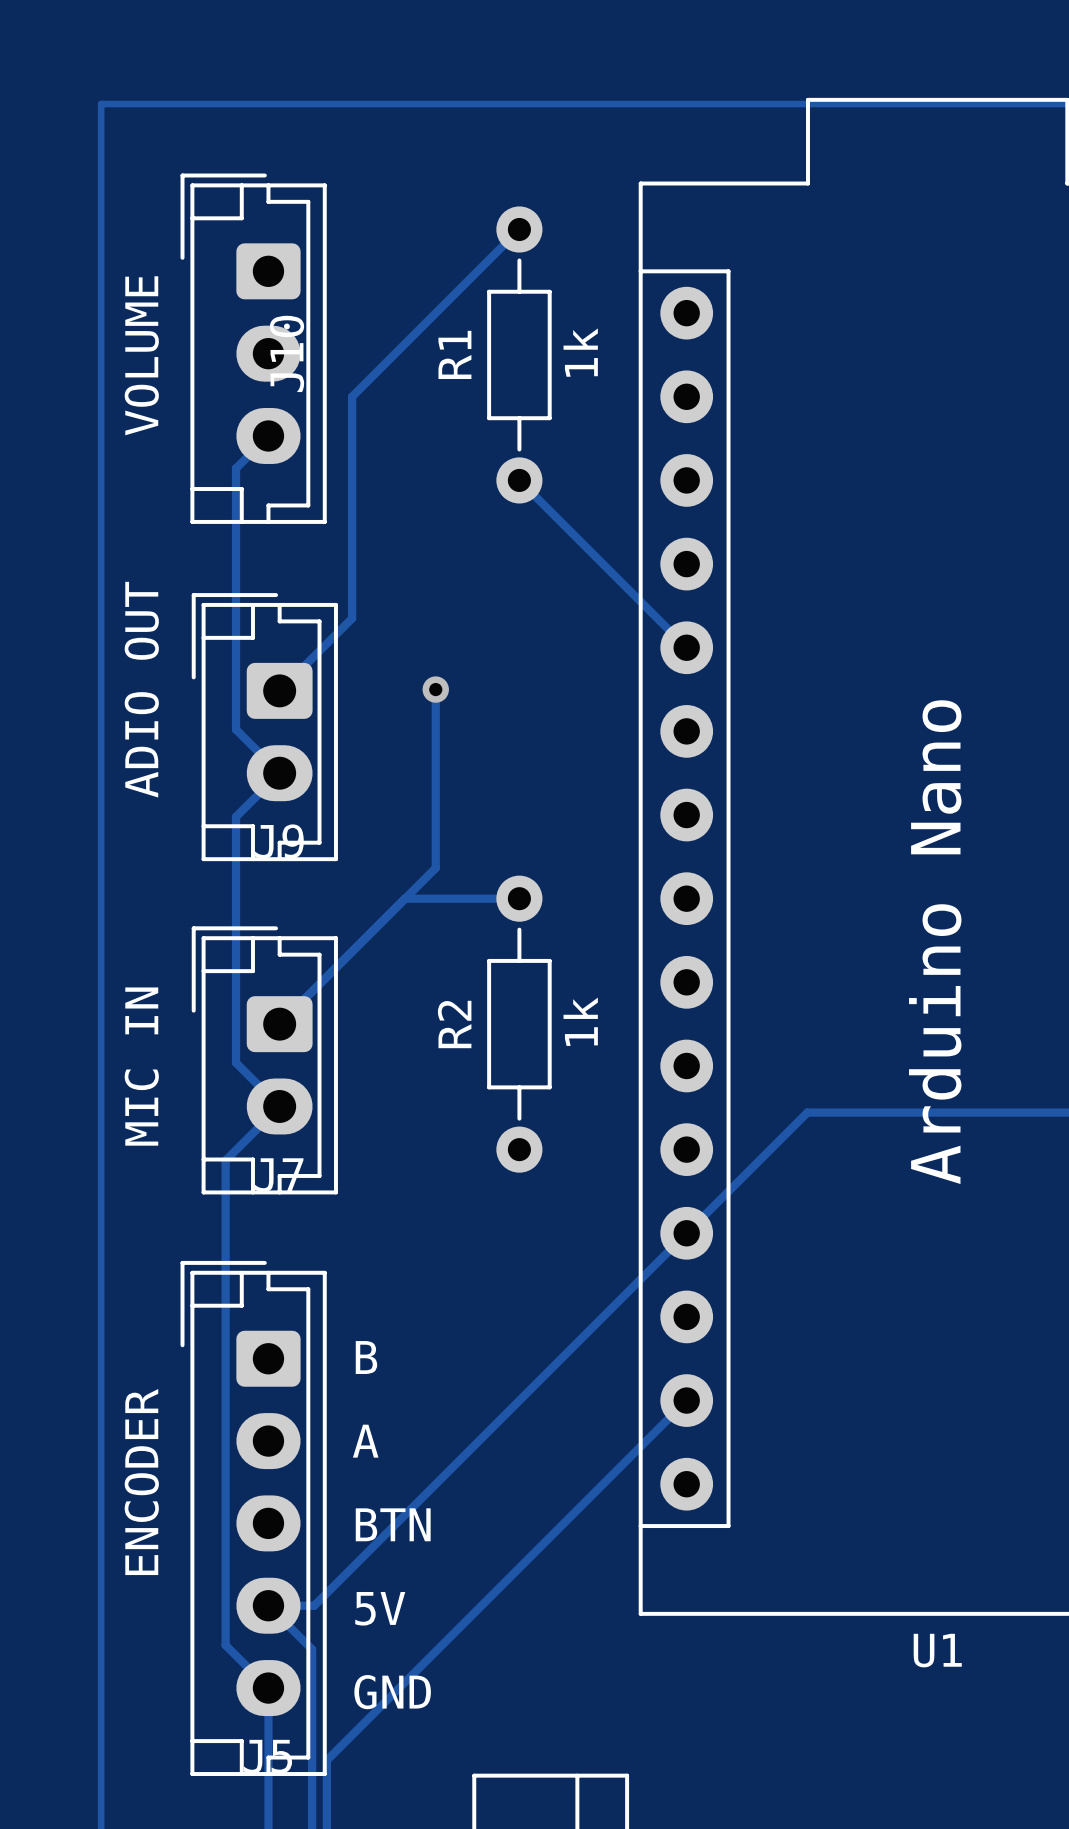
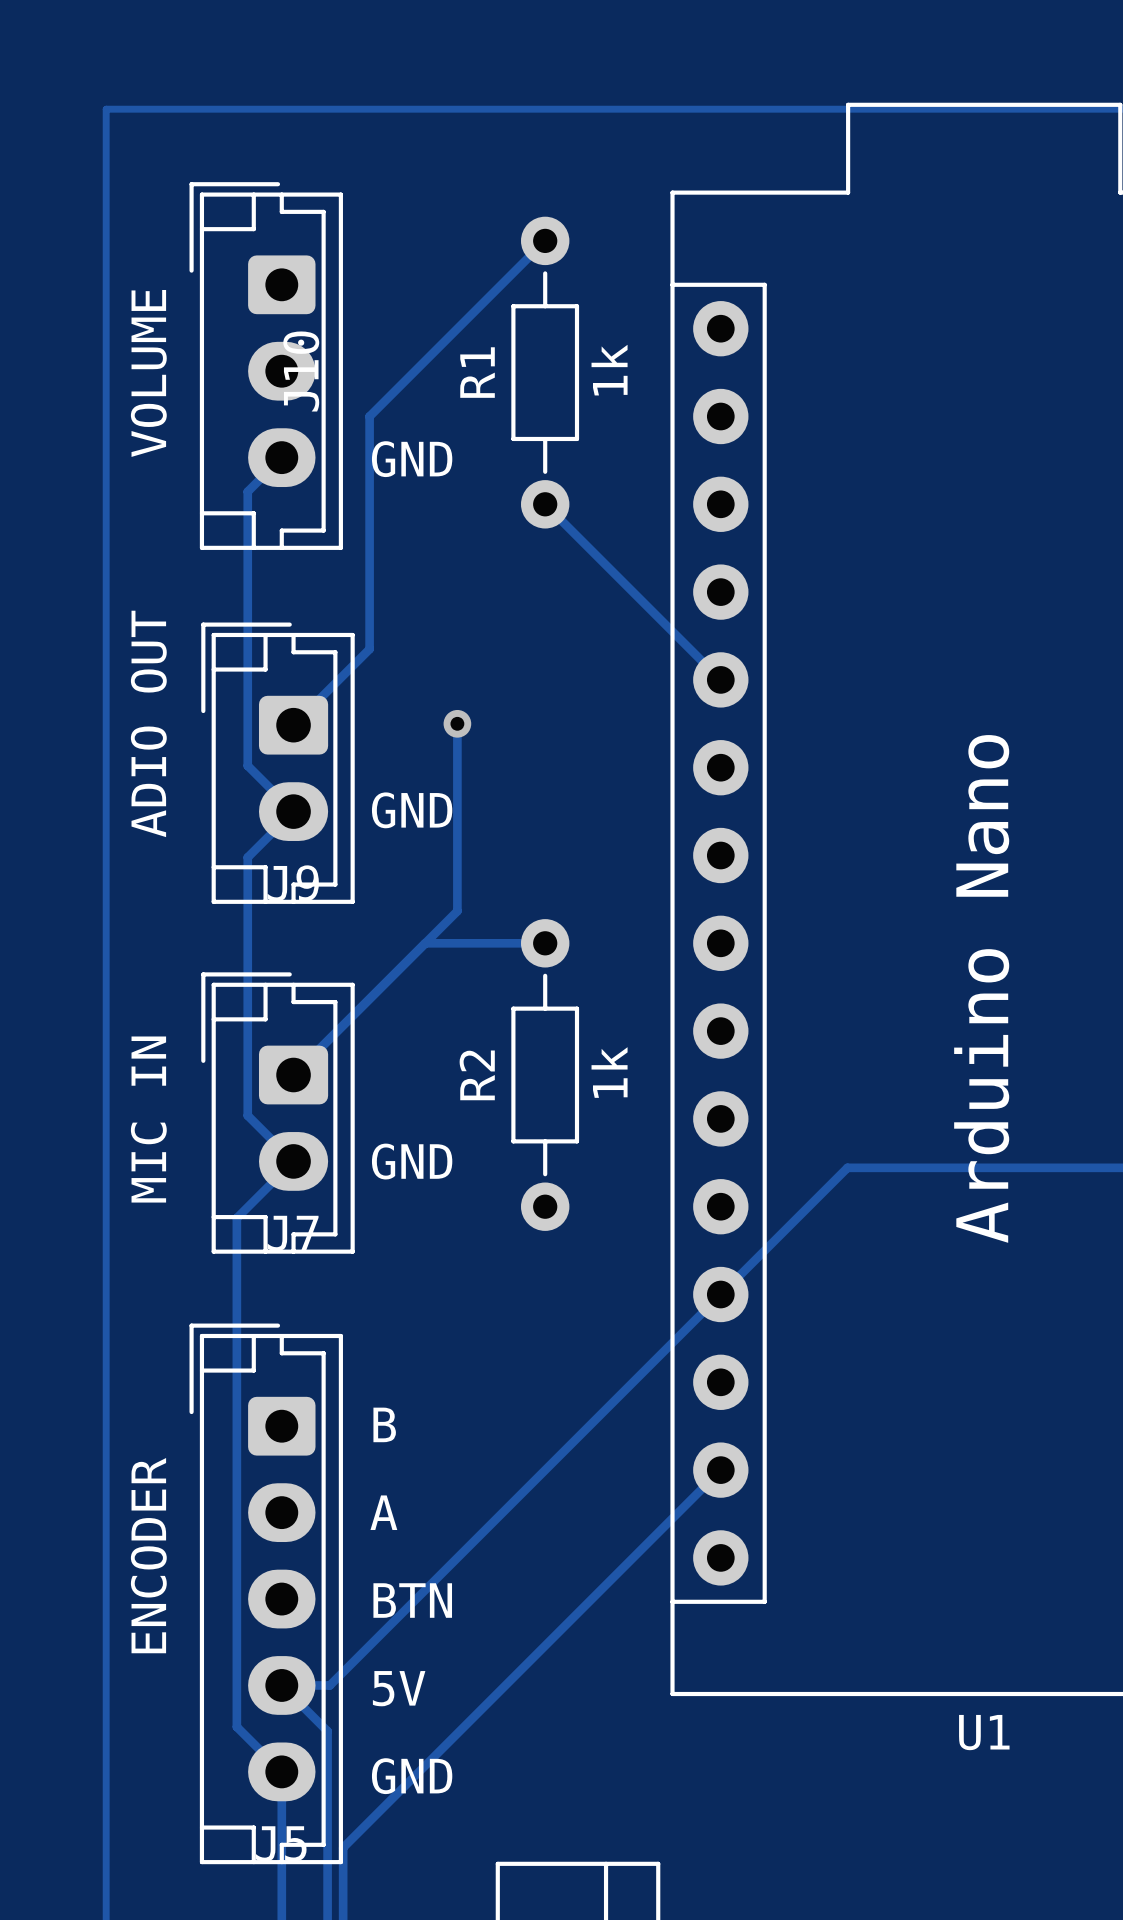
text: none -> GND (412, 459)
text: none -> GND (412, 810)
text: none -> GND (412, 1161)

